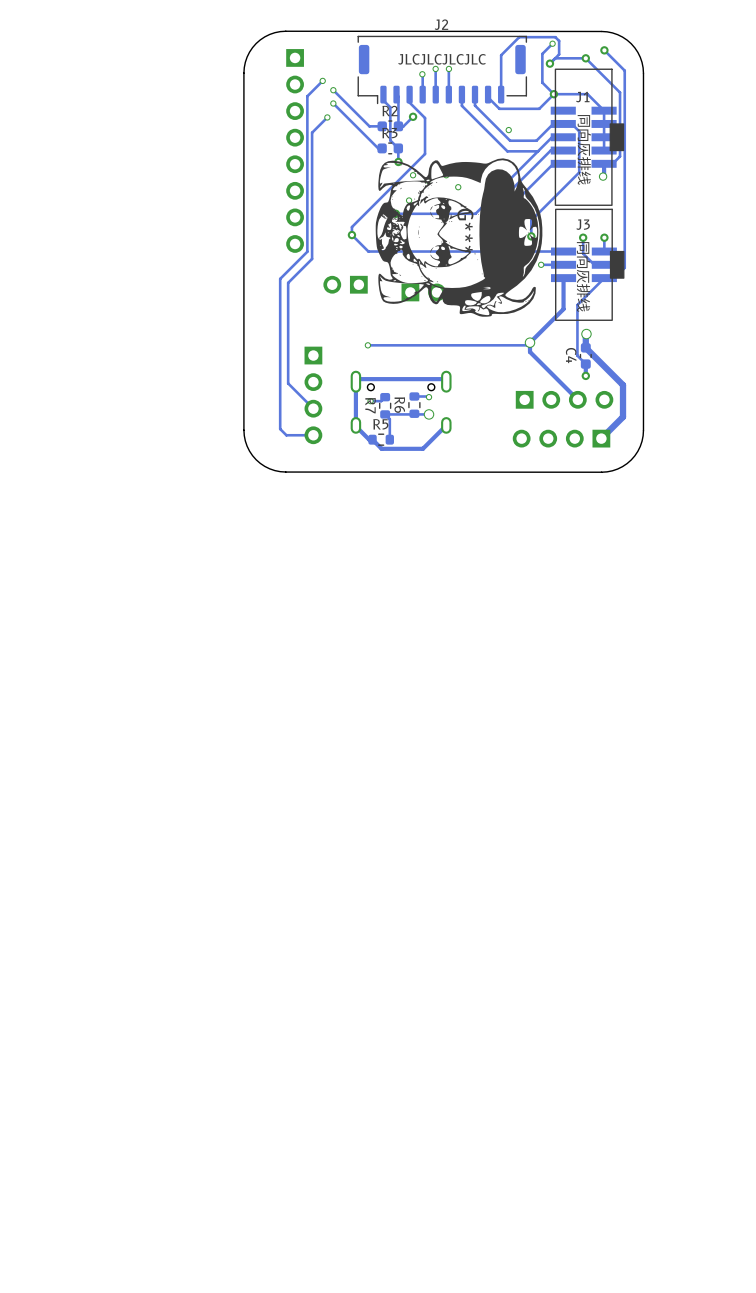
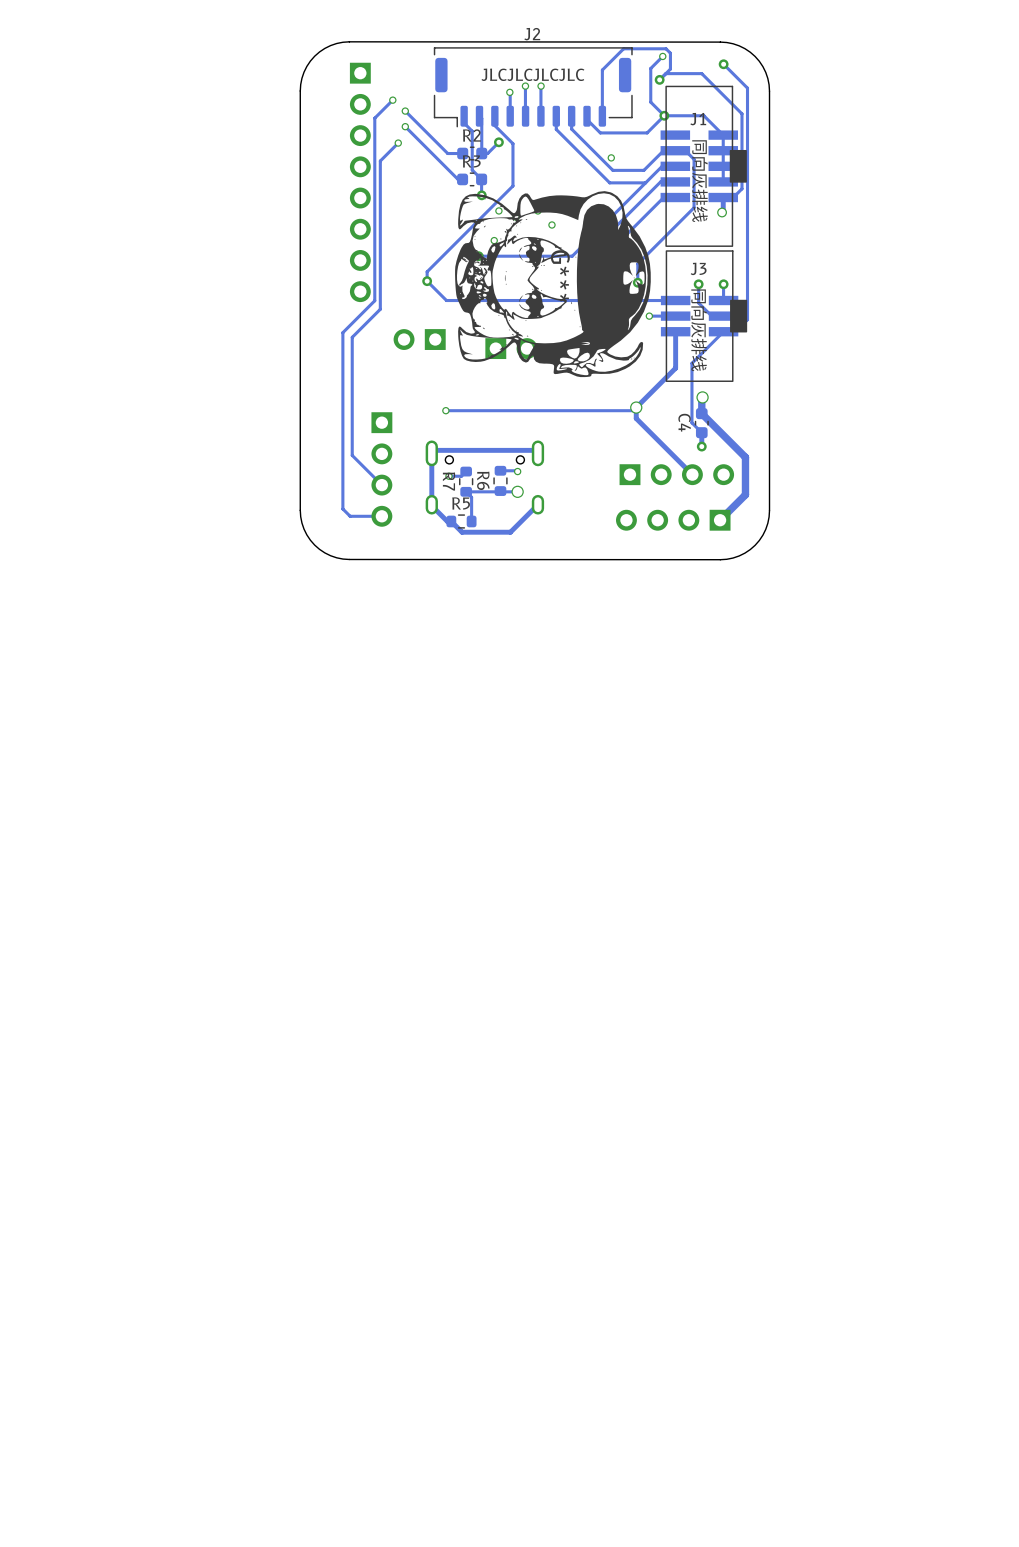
via: (585, 58) -> none

